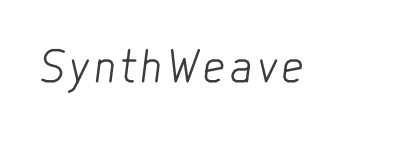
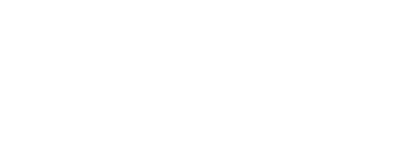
text: SynthWeave (171, 70) -> none

